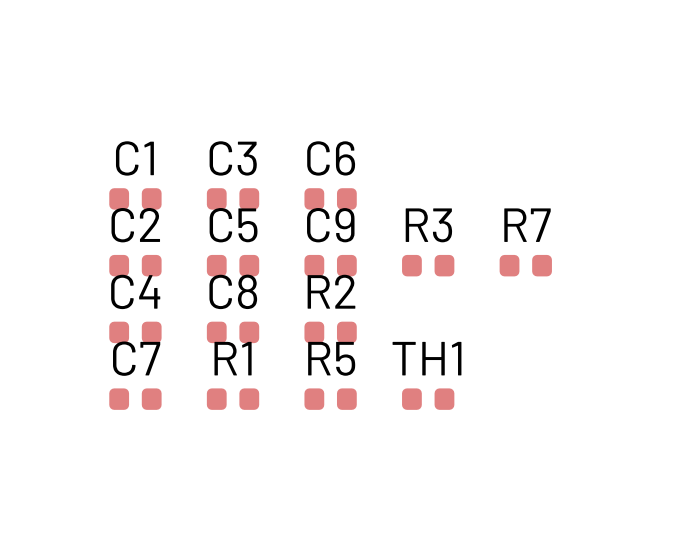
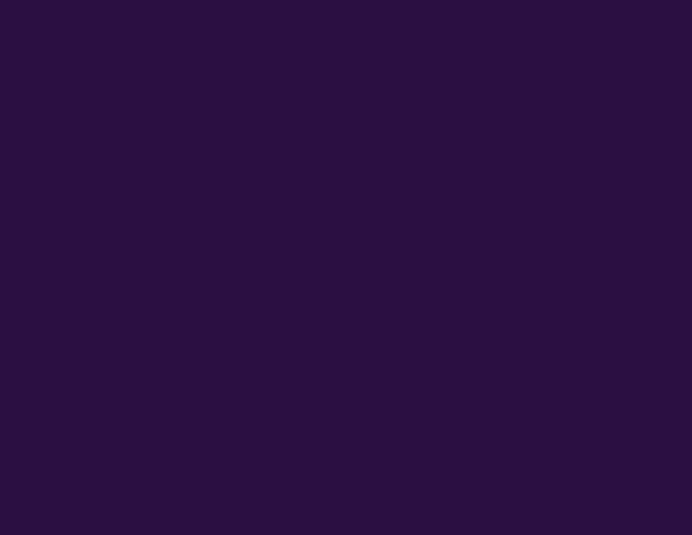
C1: (135, 198) -> none
C3: (233, 198) -> none
C6: (330, 198) -> none
C2: (135, 265) -> none
C5: (233, 265) -> none
C9: (330, 265) -> none
R3: (428, 265) -> none
R7: (525, 265) -> none
C4: (135, 332) -> none
C8: (233, 332) -> none
R2: (330, 332) -> none
C7: (135, 399) -> none
R1: (233, 399) -> none
R5: (330, 399) -> none
TH1: (428, 399) -> none

